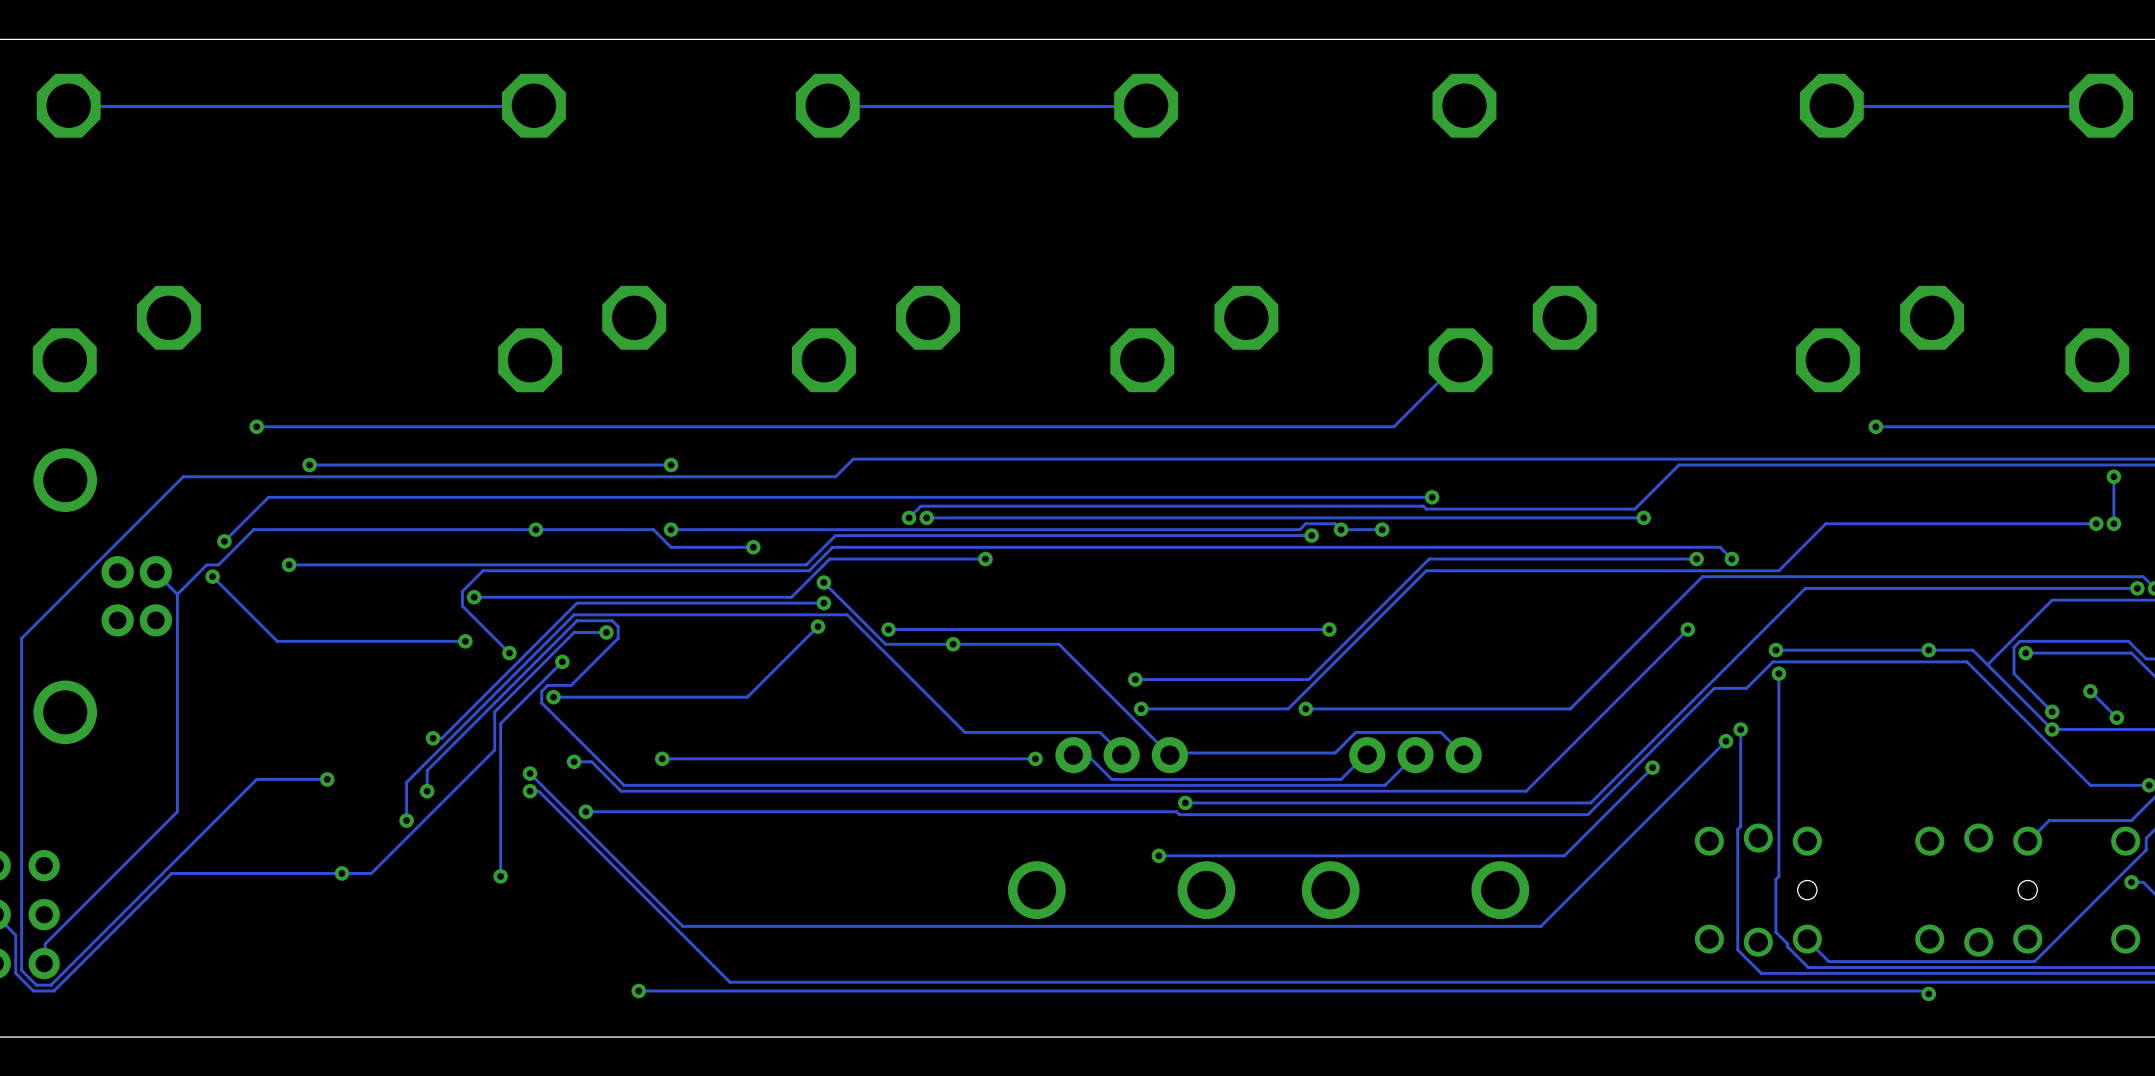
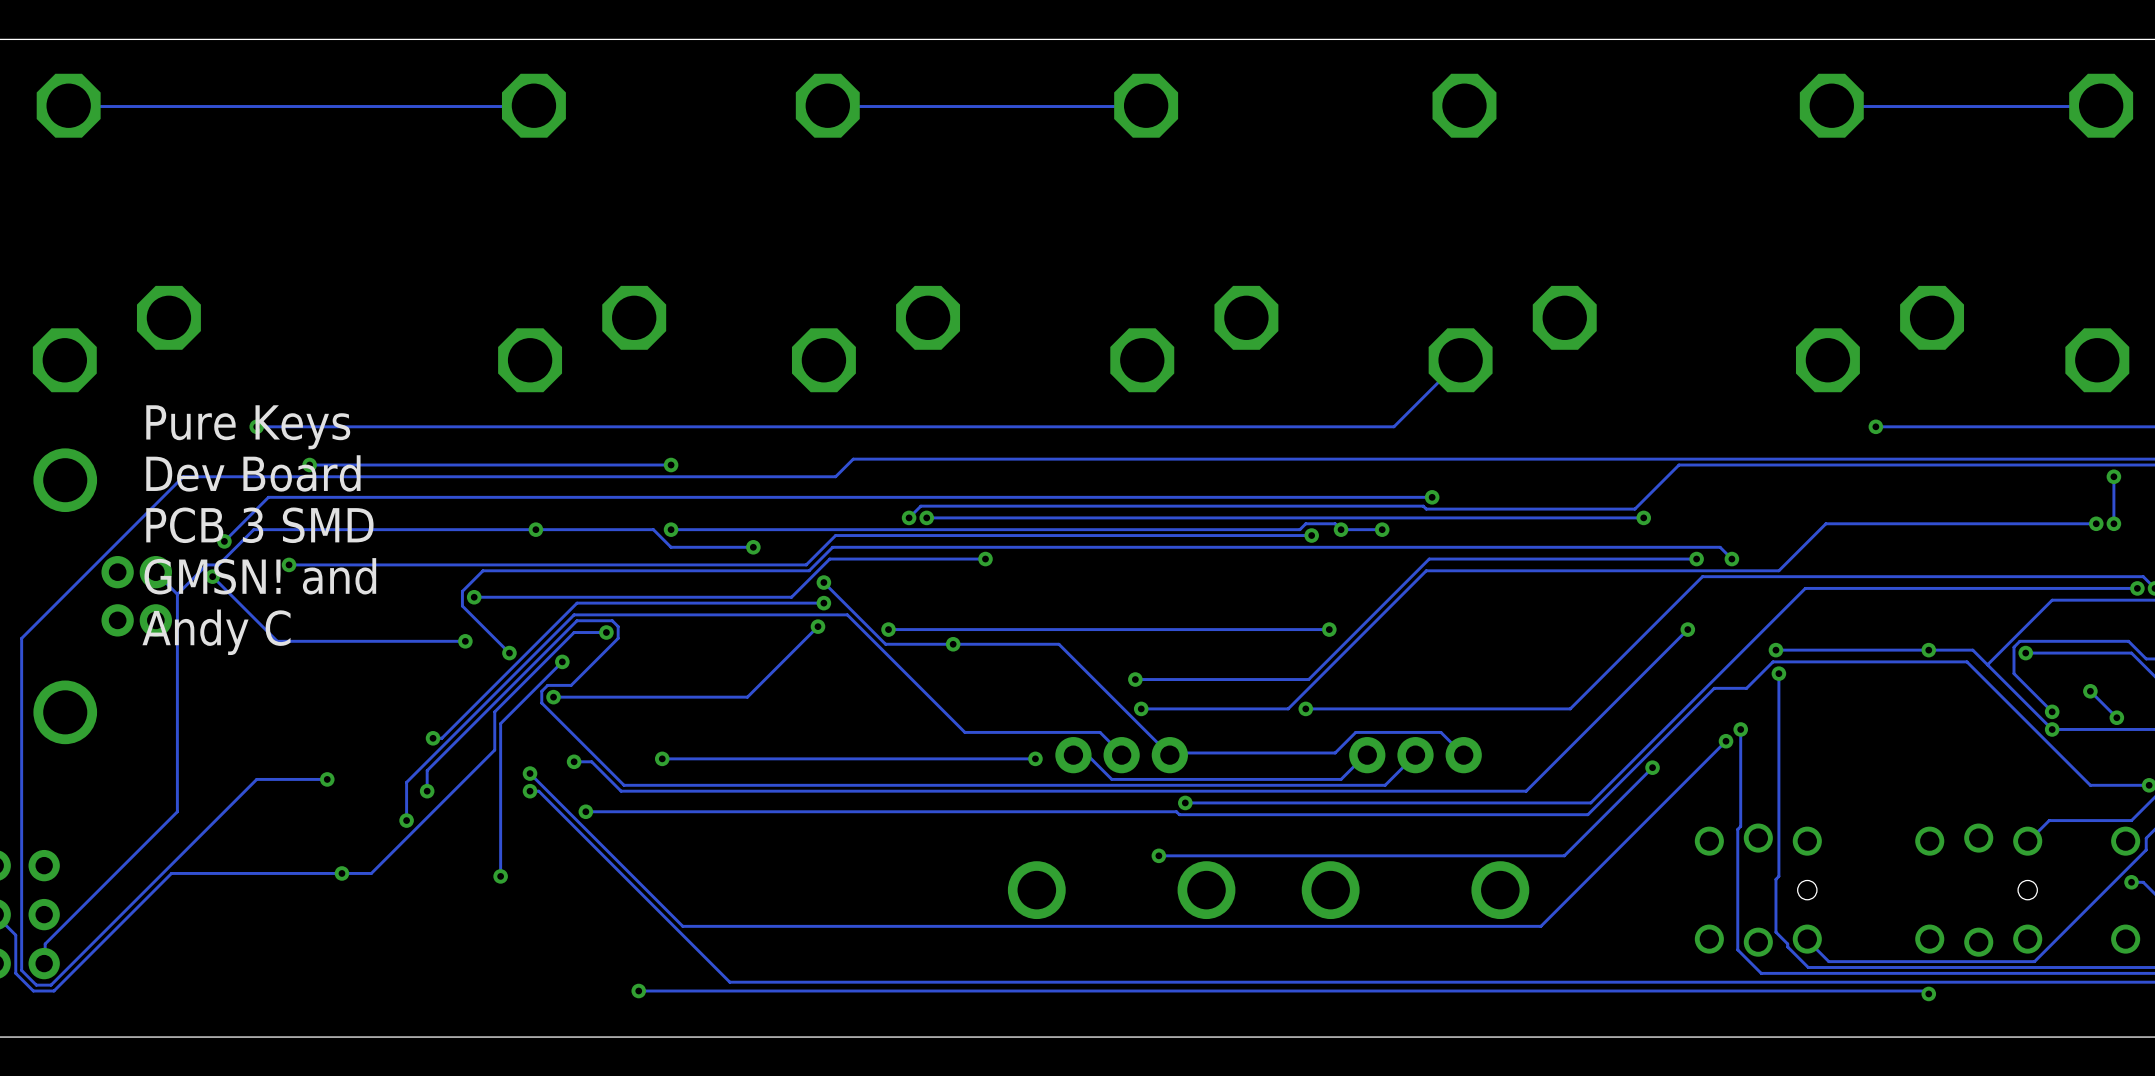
text: none -> Pure Keys (248, 427)
text: none -> Dev Board (253, 473)
text: none -> PCB 3 SMD (259, 525)
text: none -> GMSN! and (260, 576)
text: none -> Andy C (216, 632)

